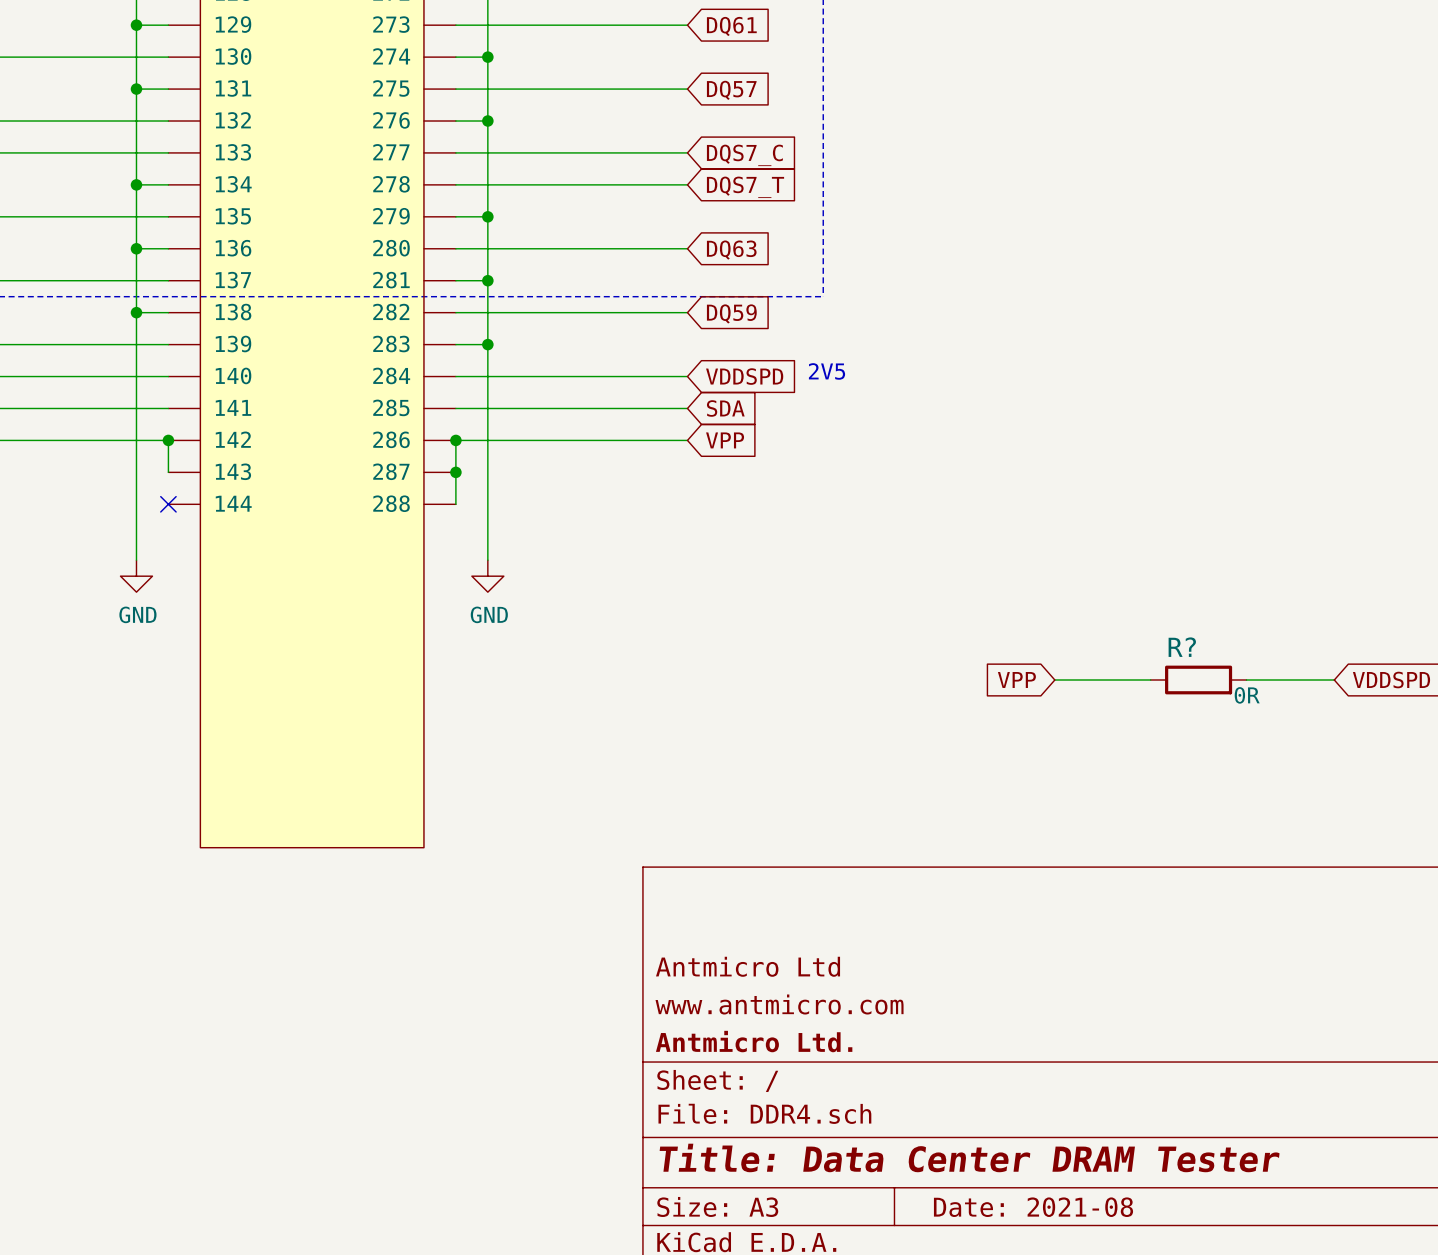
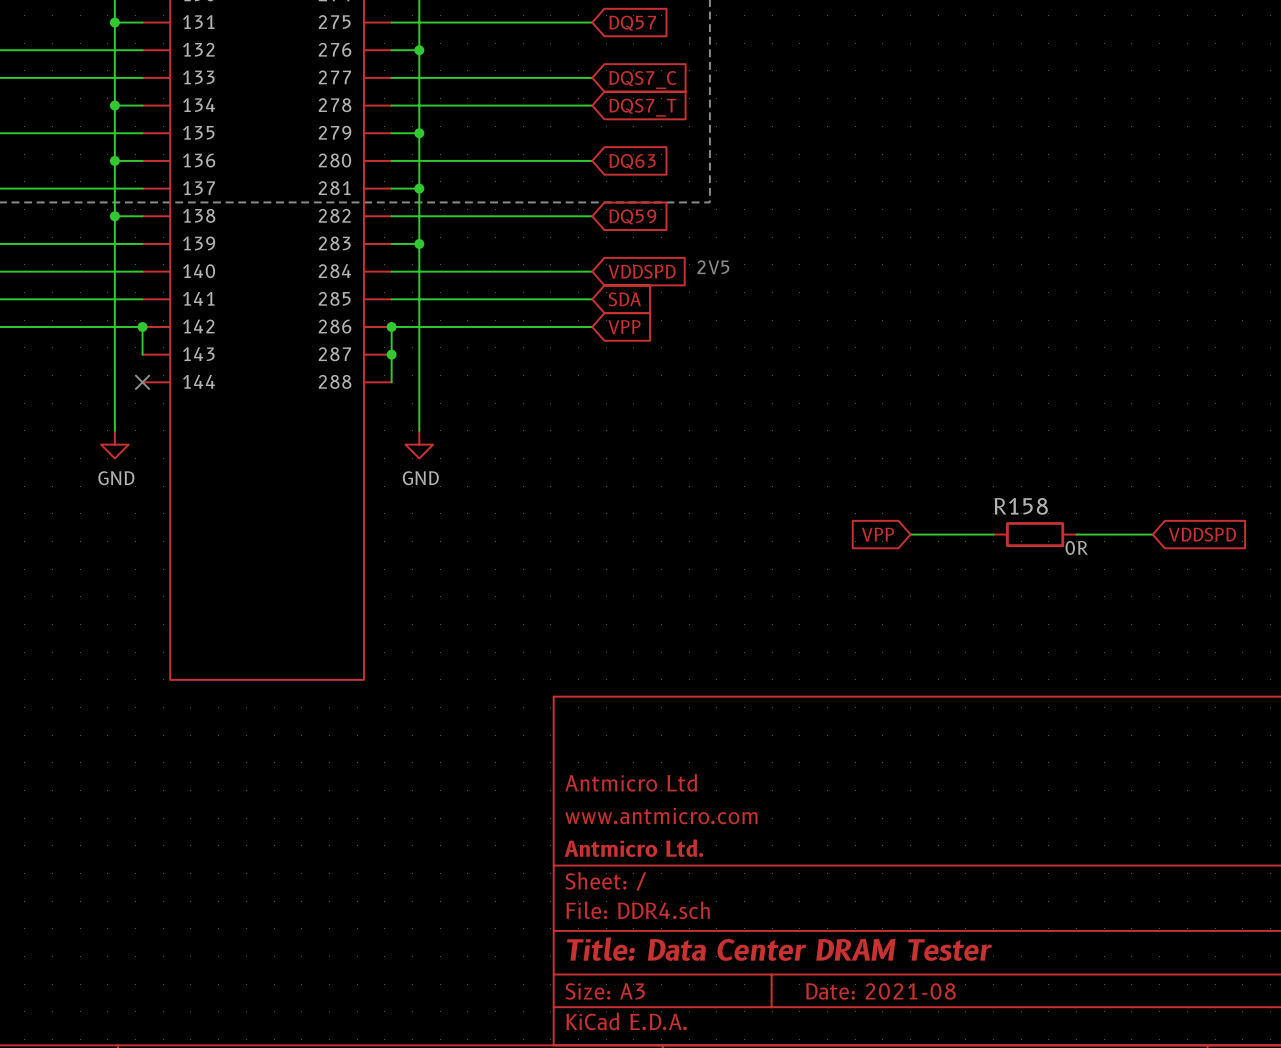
R? name: R? (1182, 647) -> R158 (1021, 506)

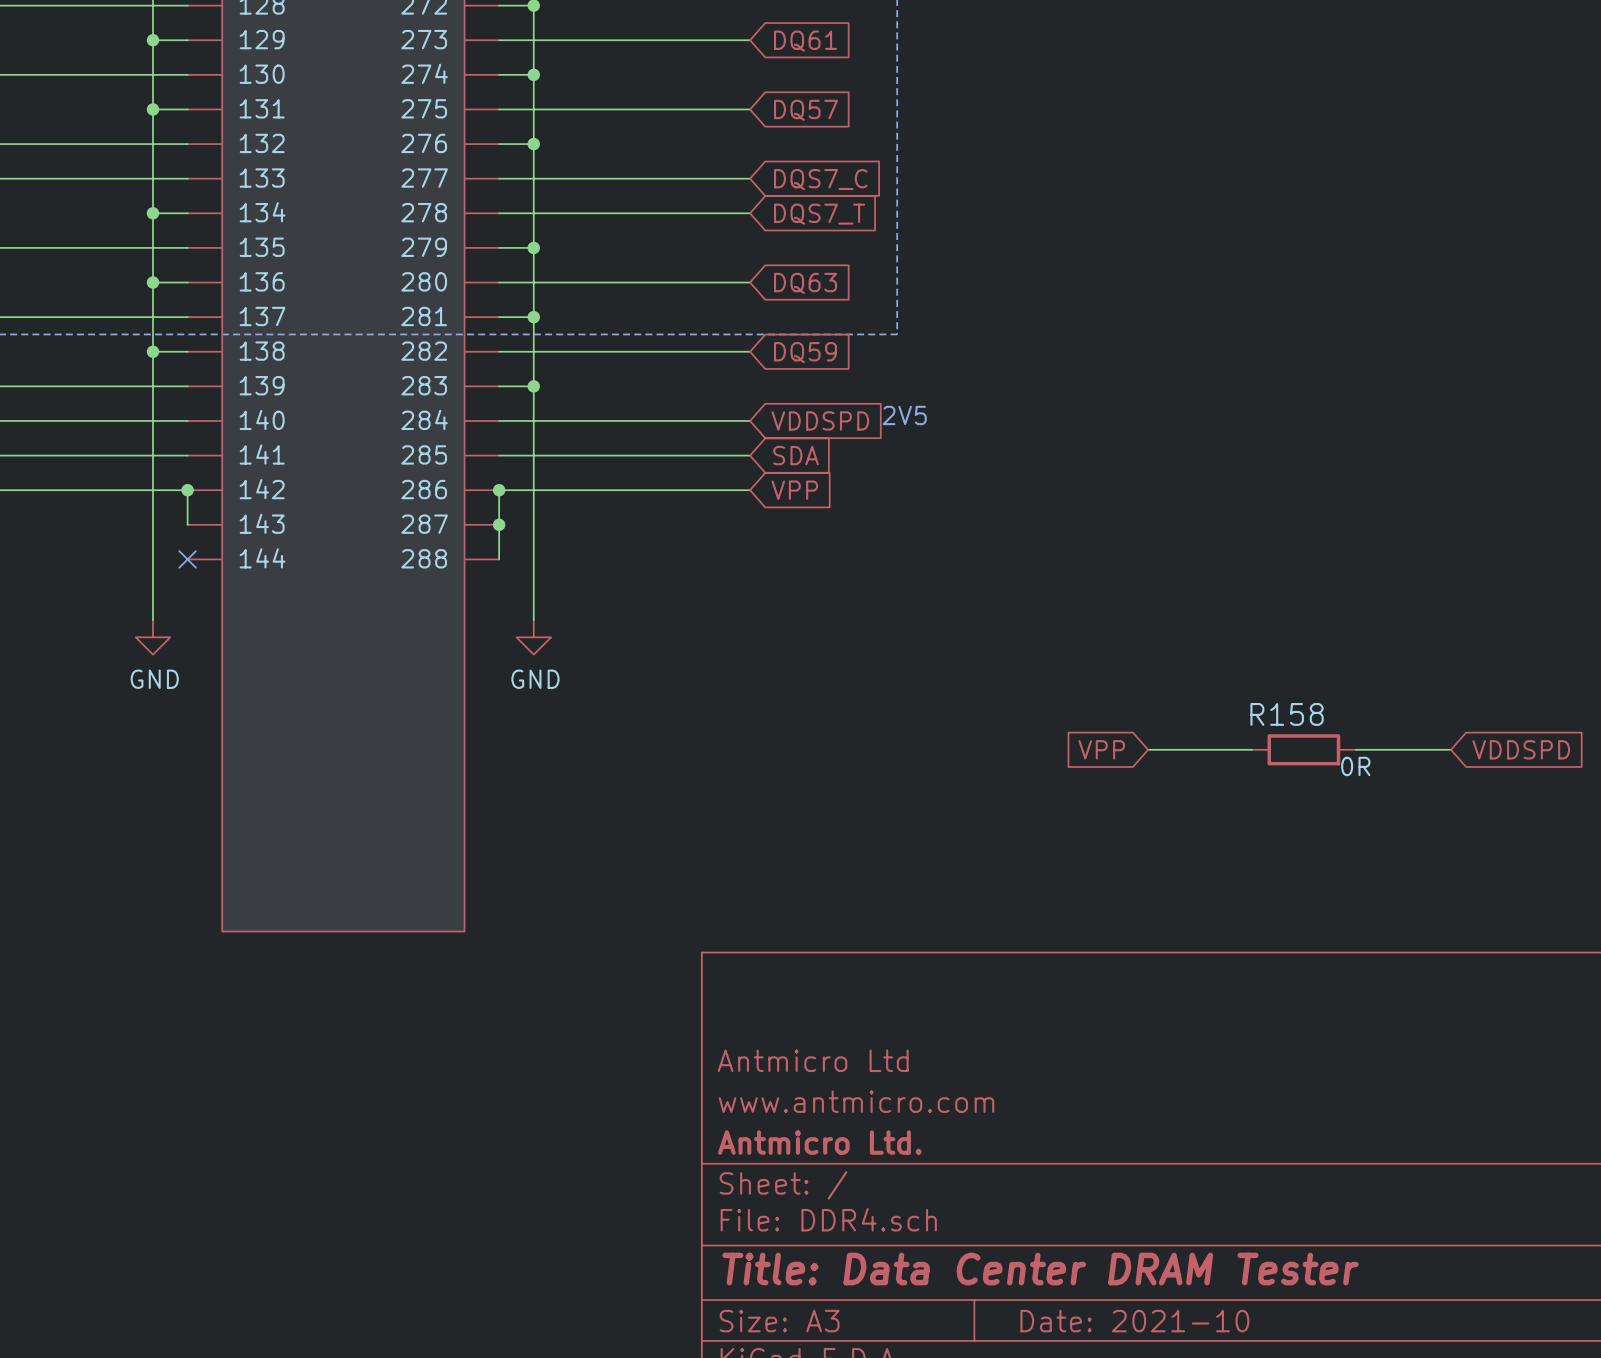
title block: Date: 2021-08 (880, 991) -> Date: 2021-10 (1134, 1321)

